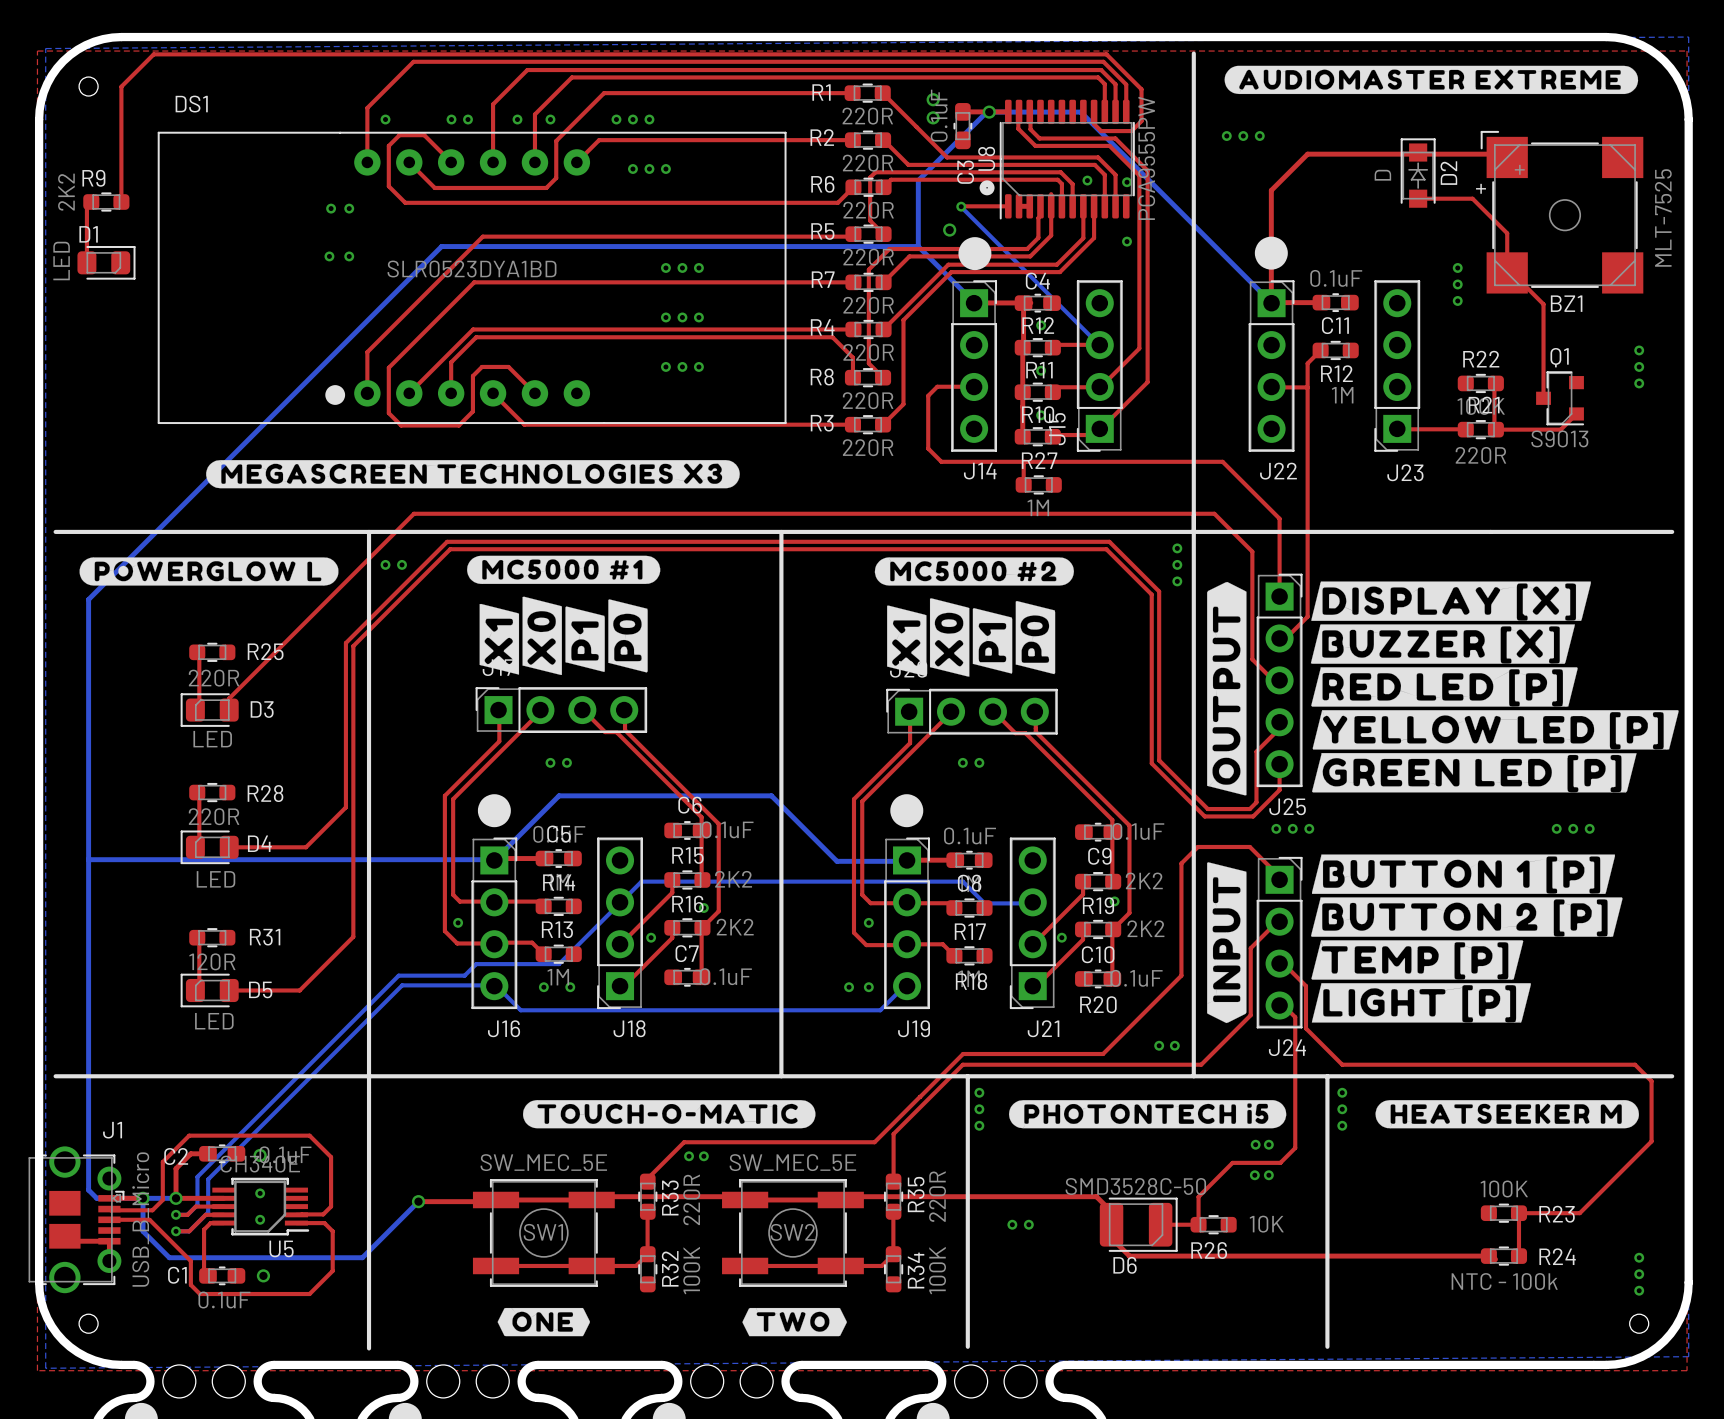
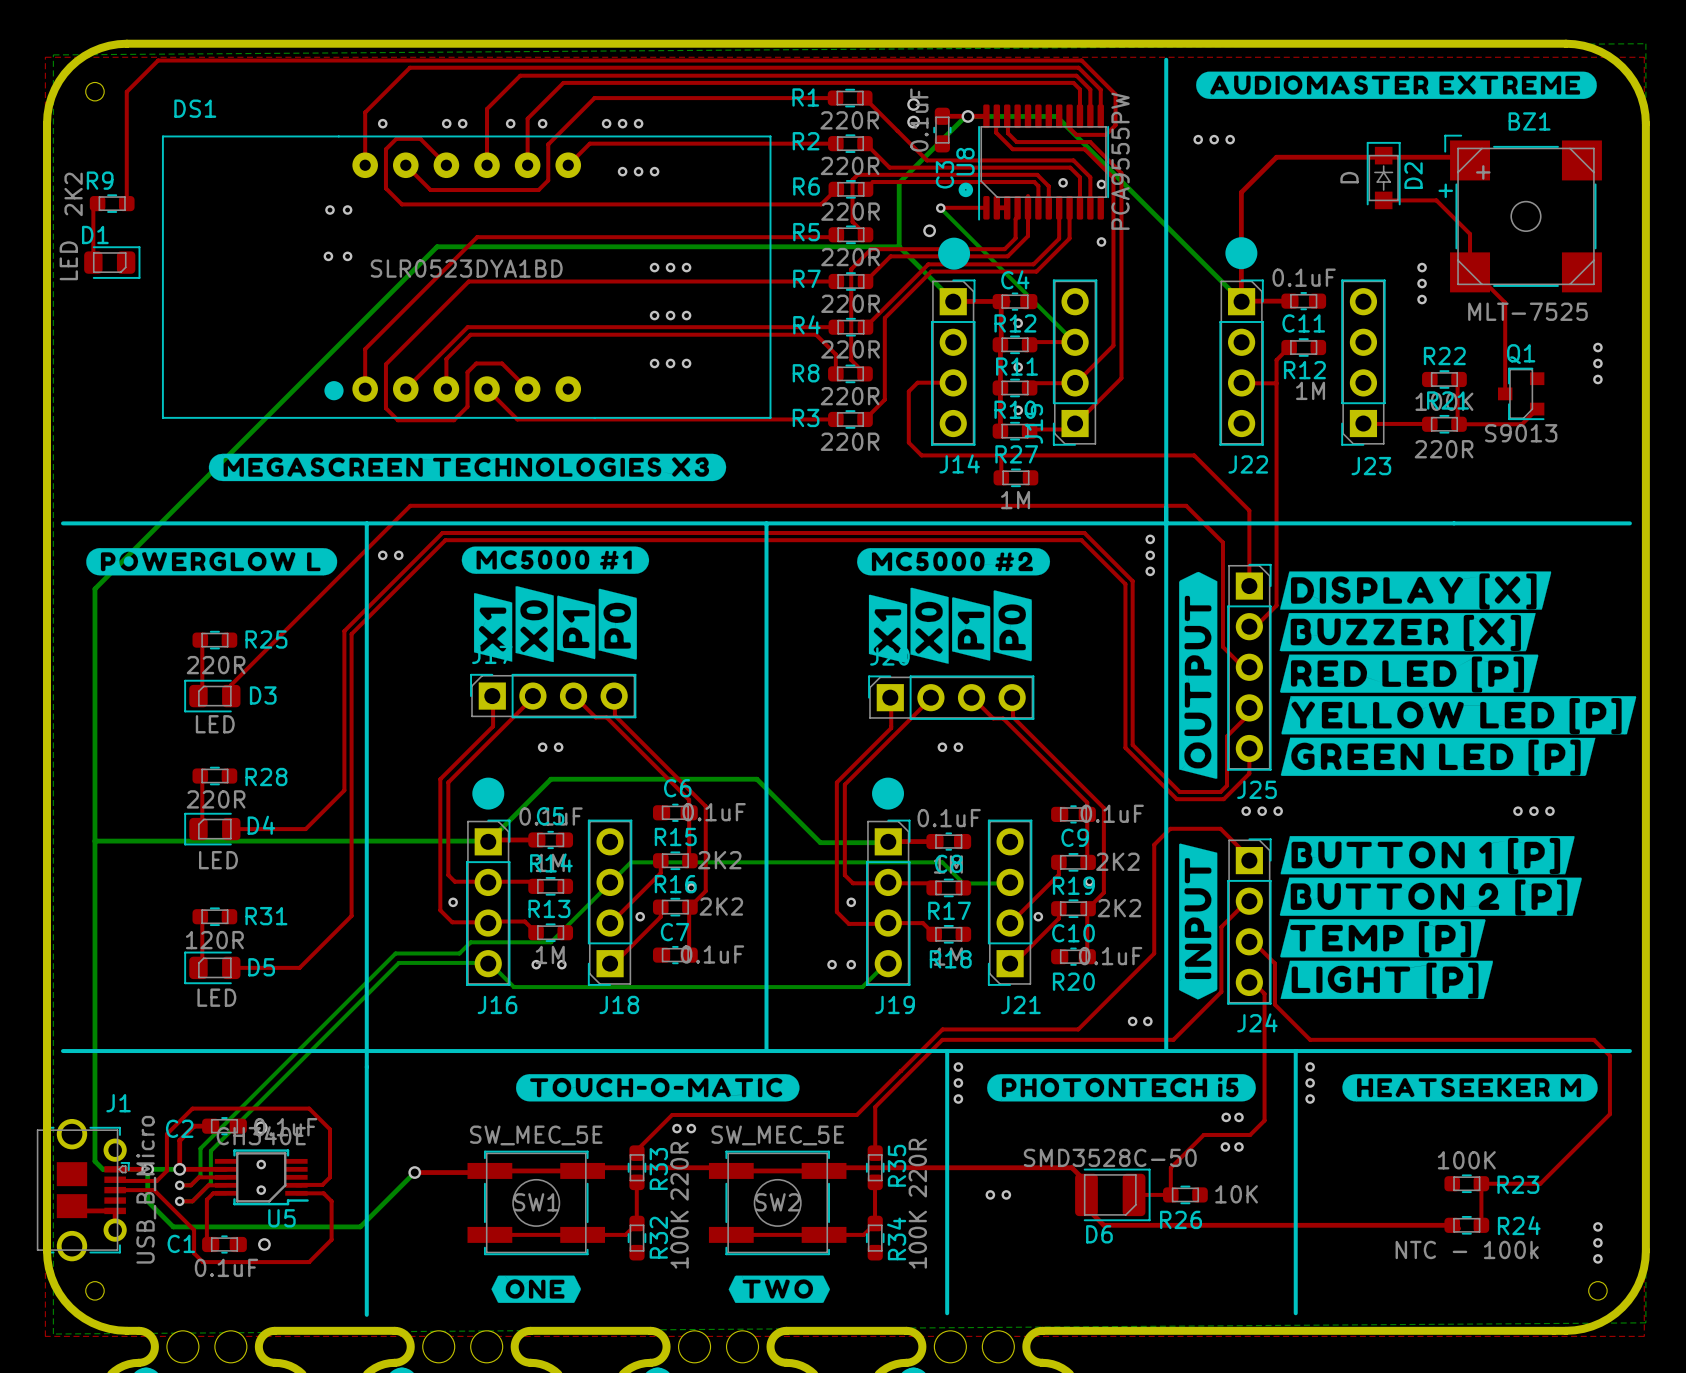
BZ1 value rotation: 0° (1663, 217) -> 90° clockwise (1527, 311)
BZ1 name position: BZ1 (1566, 303) -> BZ1 (1529, 121)

